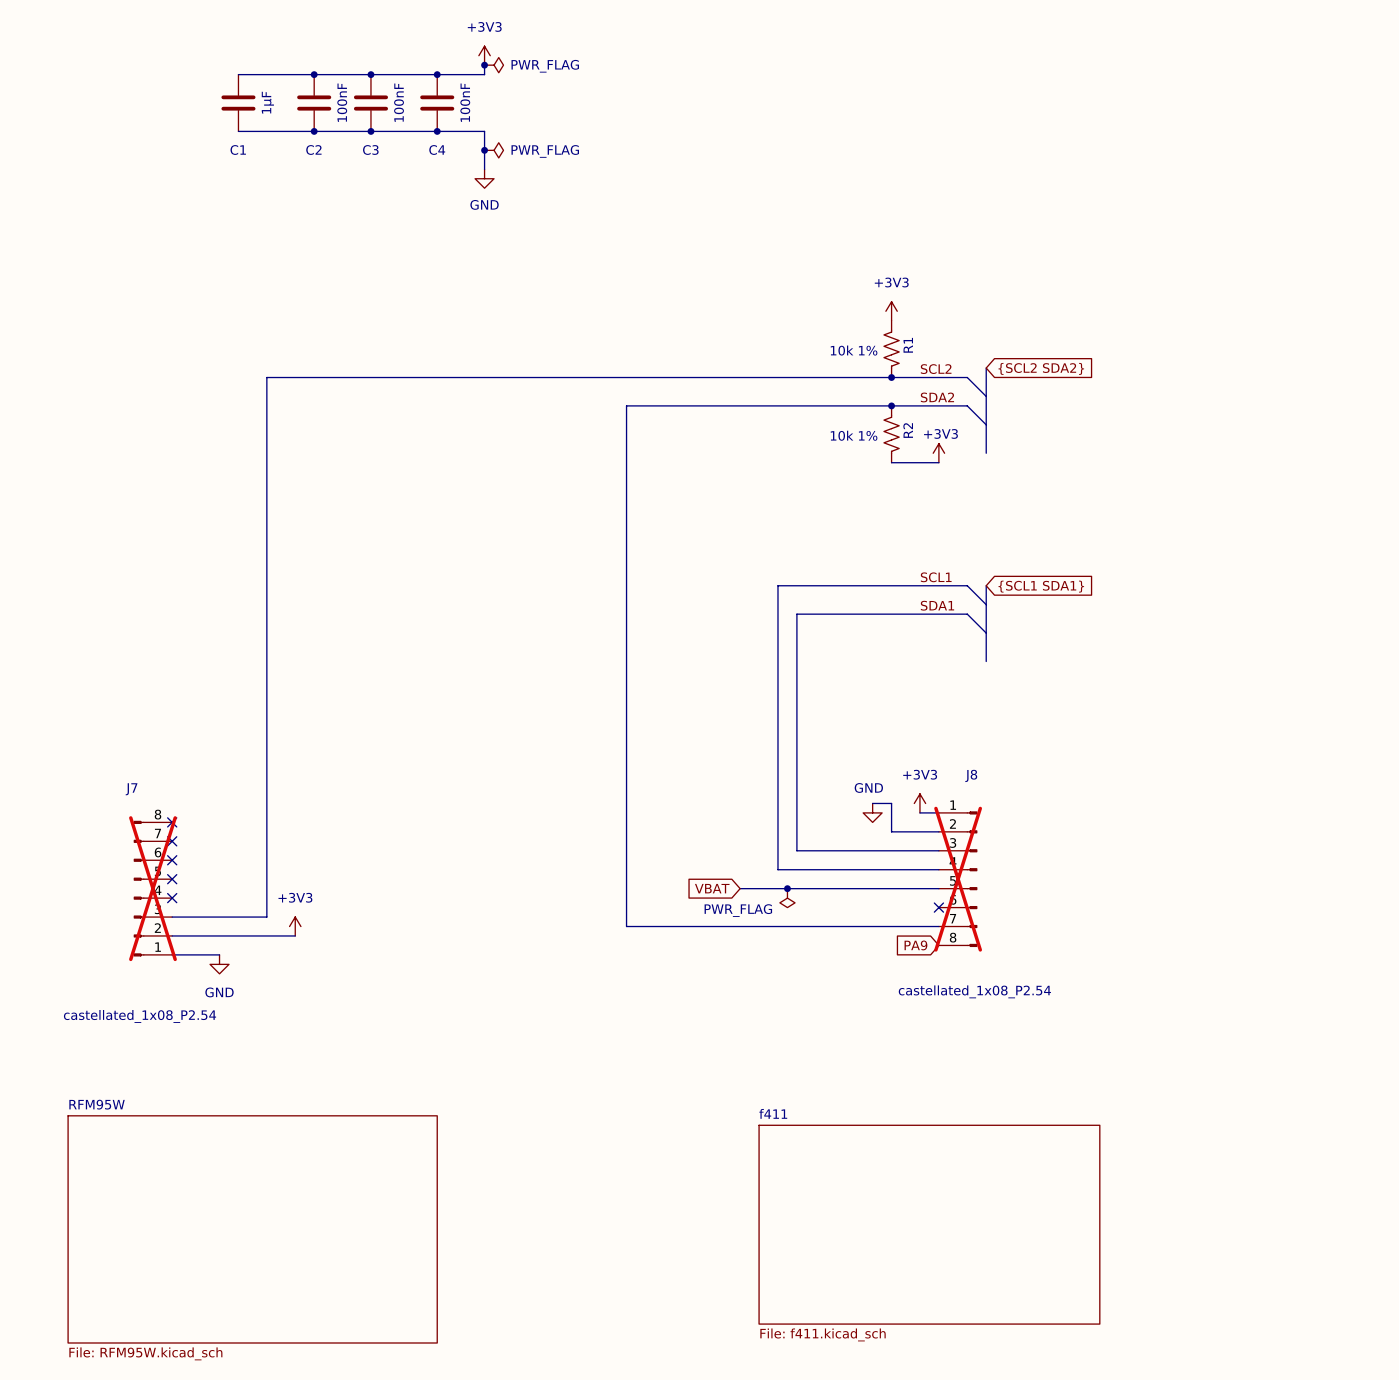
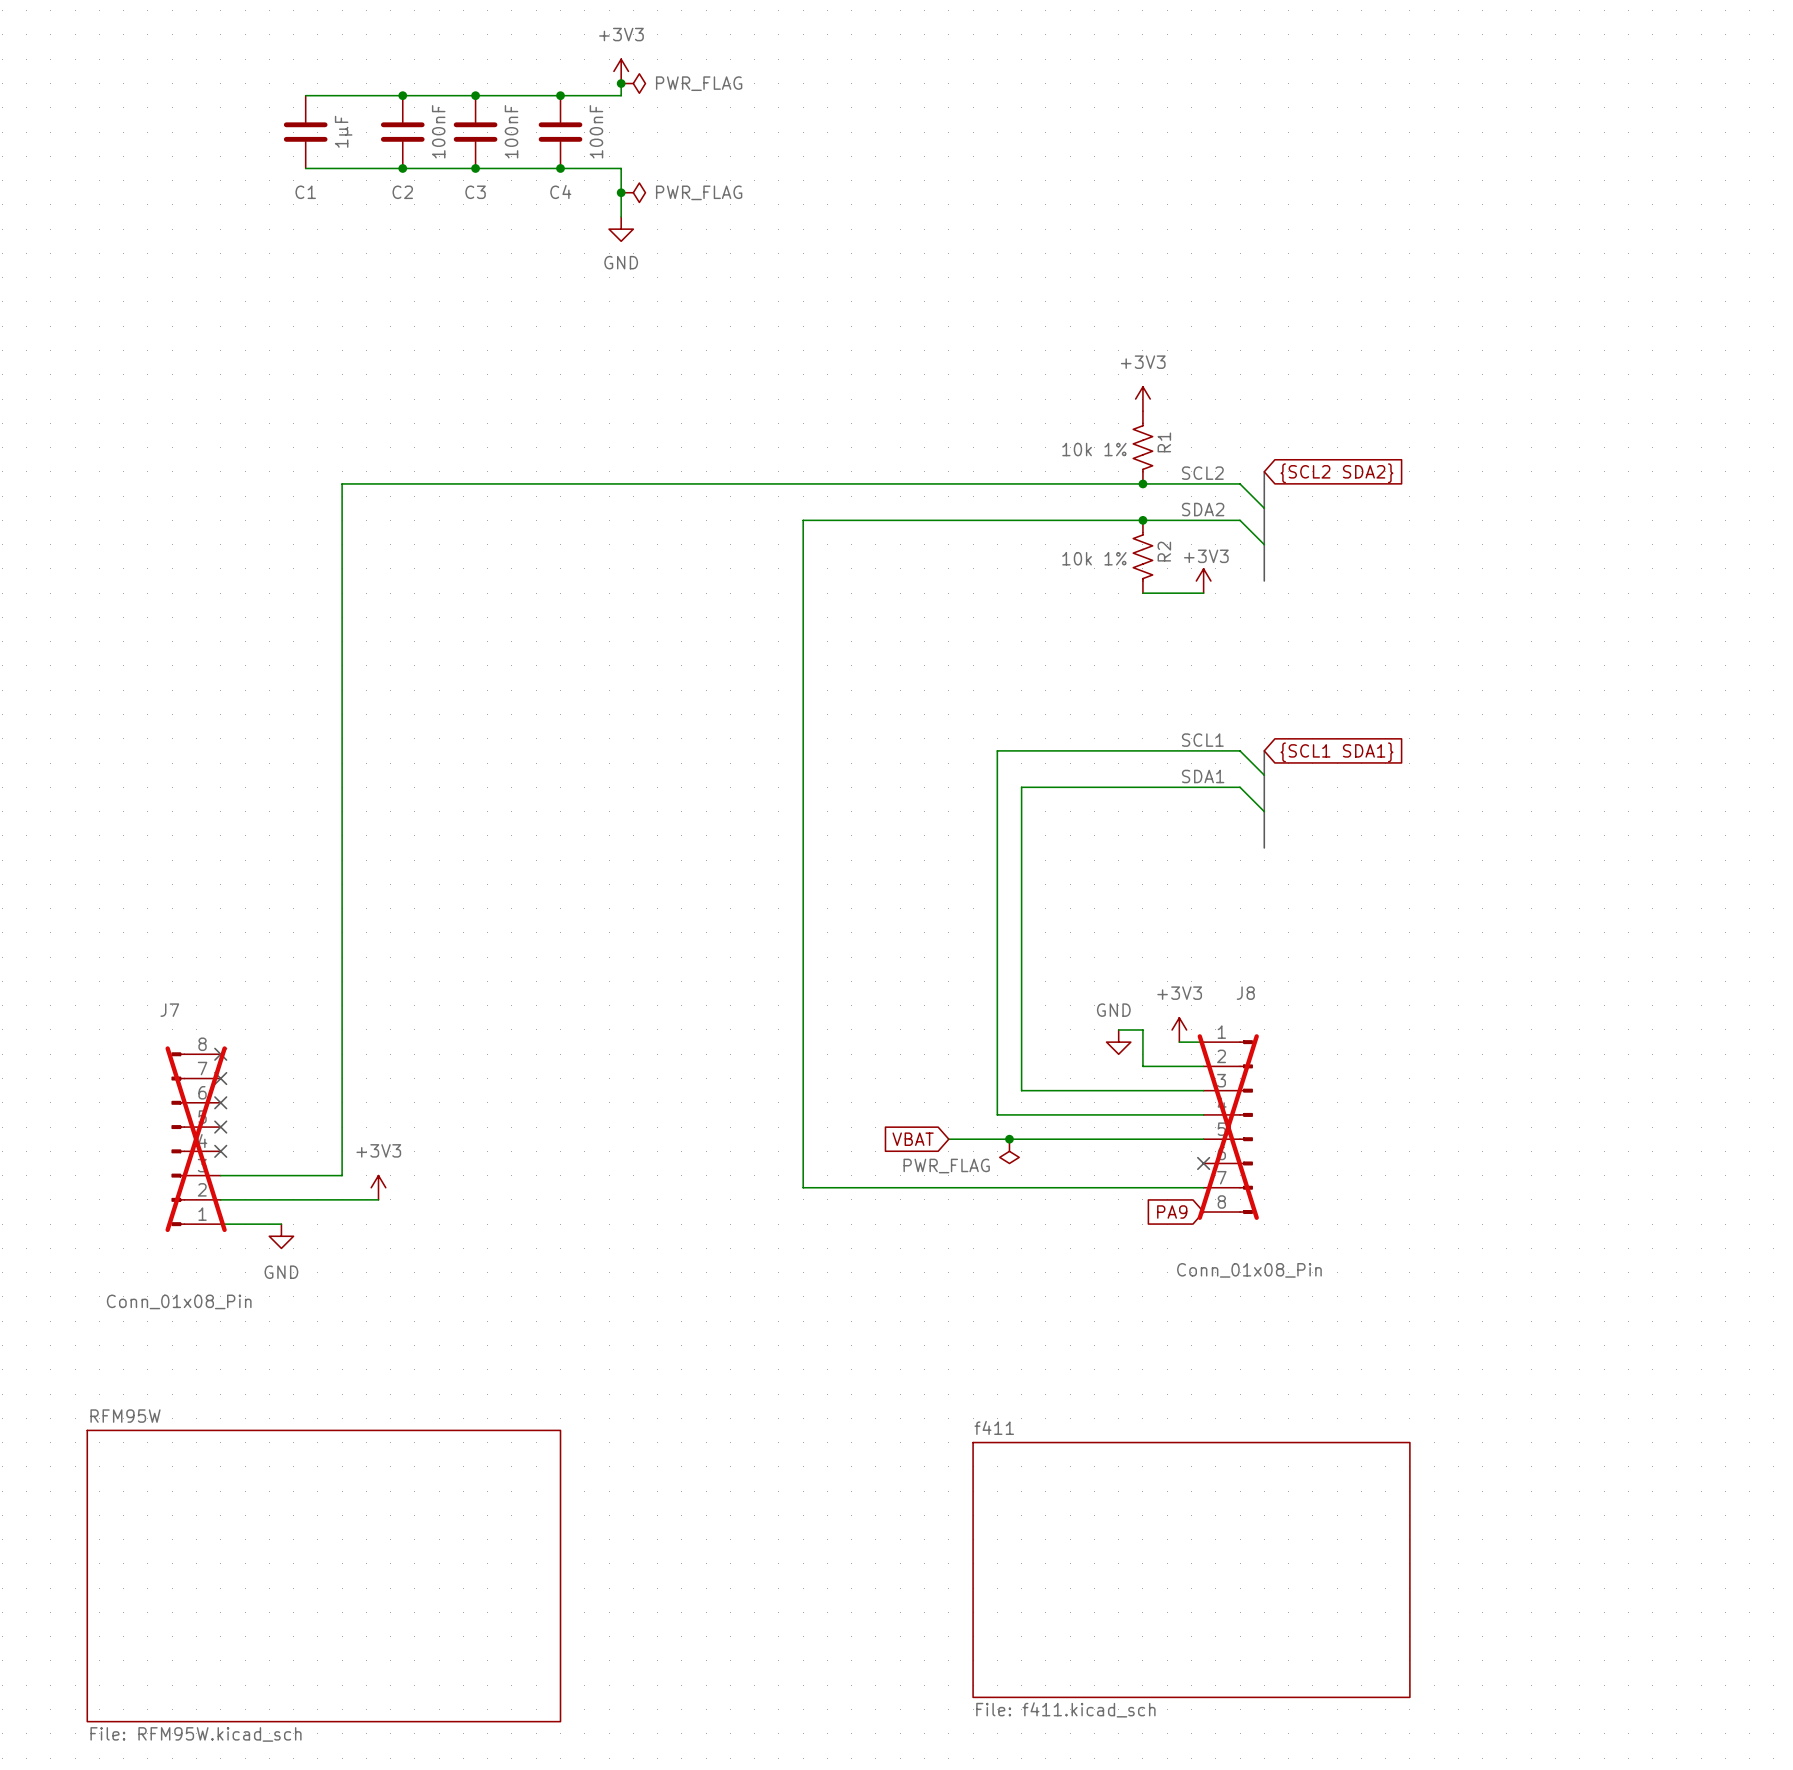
J8 value: castellated_1x08_P2.54 (974, 991) -> Conn_01x08_Pin (1249, 1270)
J7 value: castellated_1x08_P2.54 (140, 1016) -> Conn_01x08_Pin (179, 1301)

